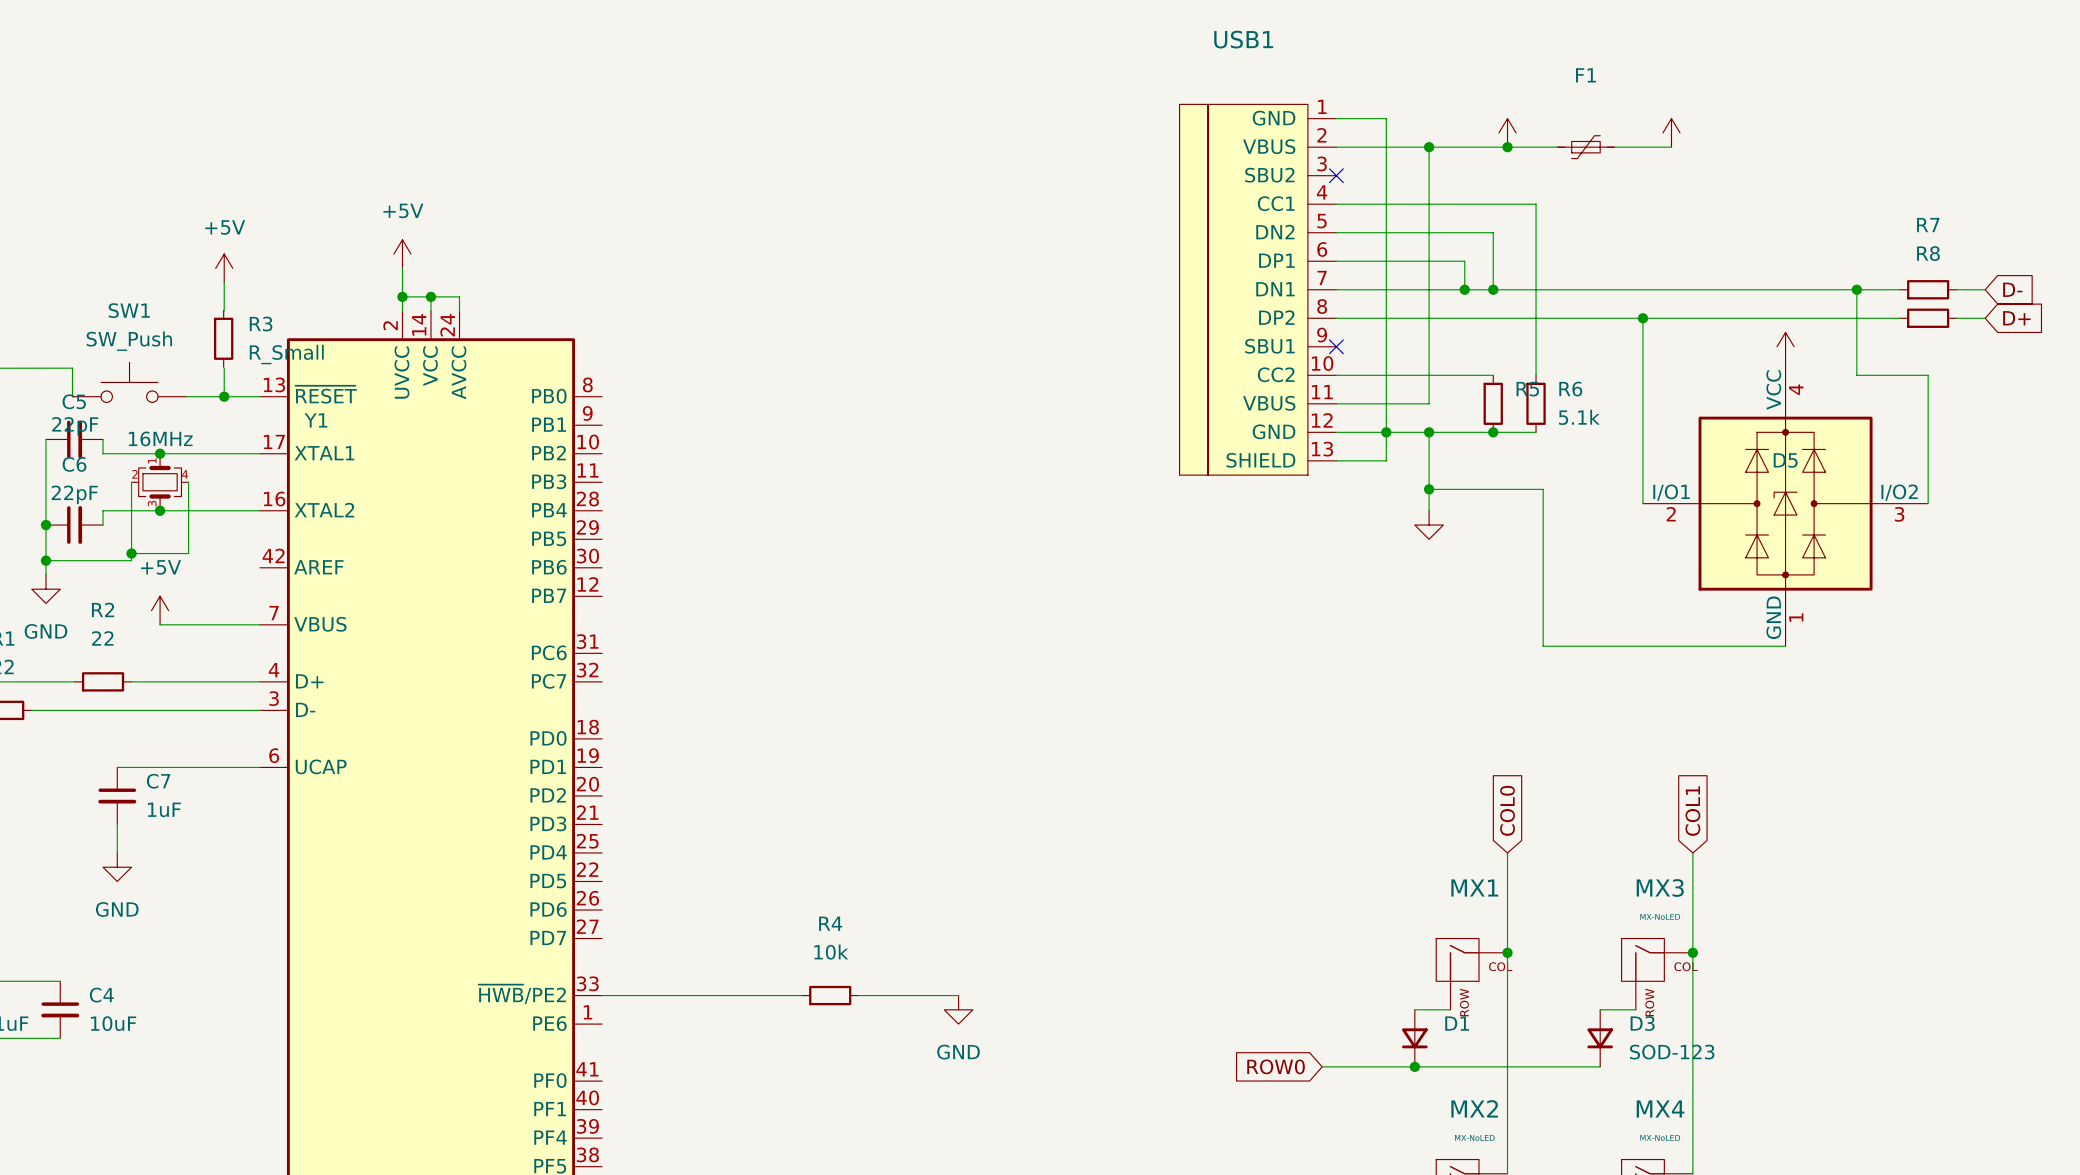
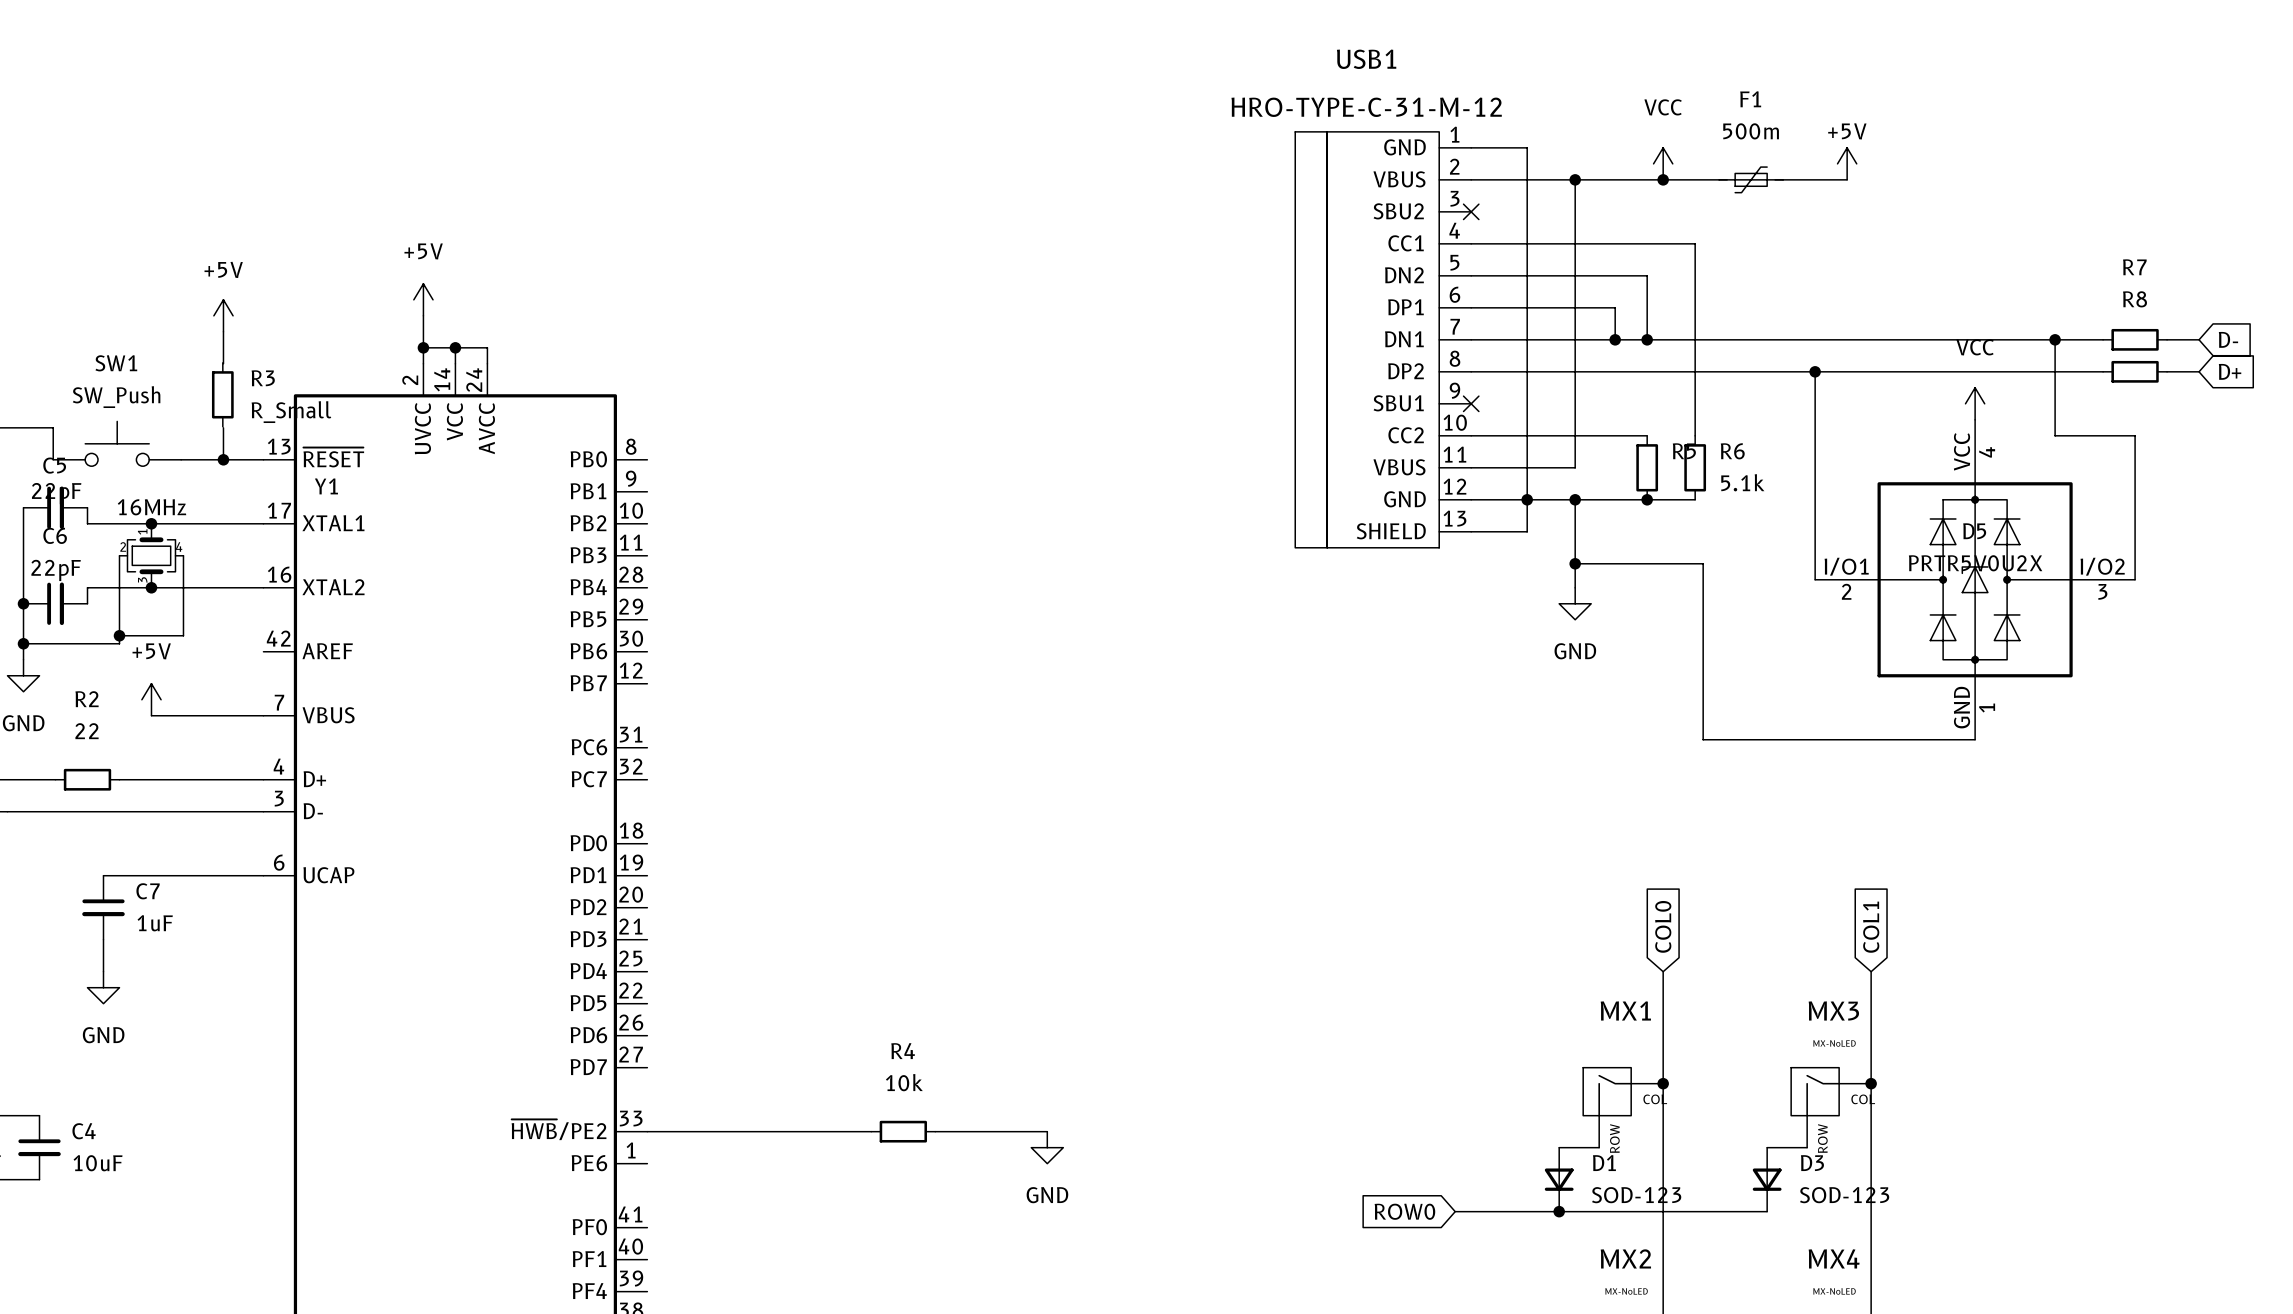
USB1 value: none -> HRO-TYPE-C-31-M-12 (1366, 107)
power symbol text: none -> VCC (1663, 107)
F1 value: none -> 500m (1751, 131)
power symbol text: none -> +5V (1847, 131)
power symbol text: none -> VCC (1975, 347)
D5 value: none -> PRTR5V0U2X (1975, 563)
power symbol text: none -> GND (1575, 651)
D1 value: none -> SOD-123 (1636, 1195)

